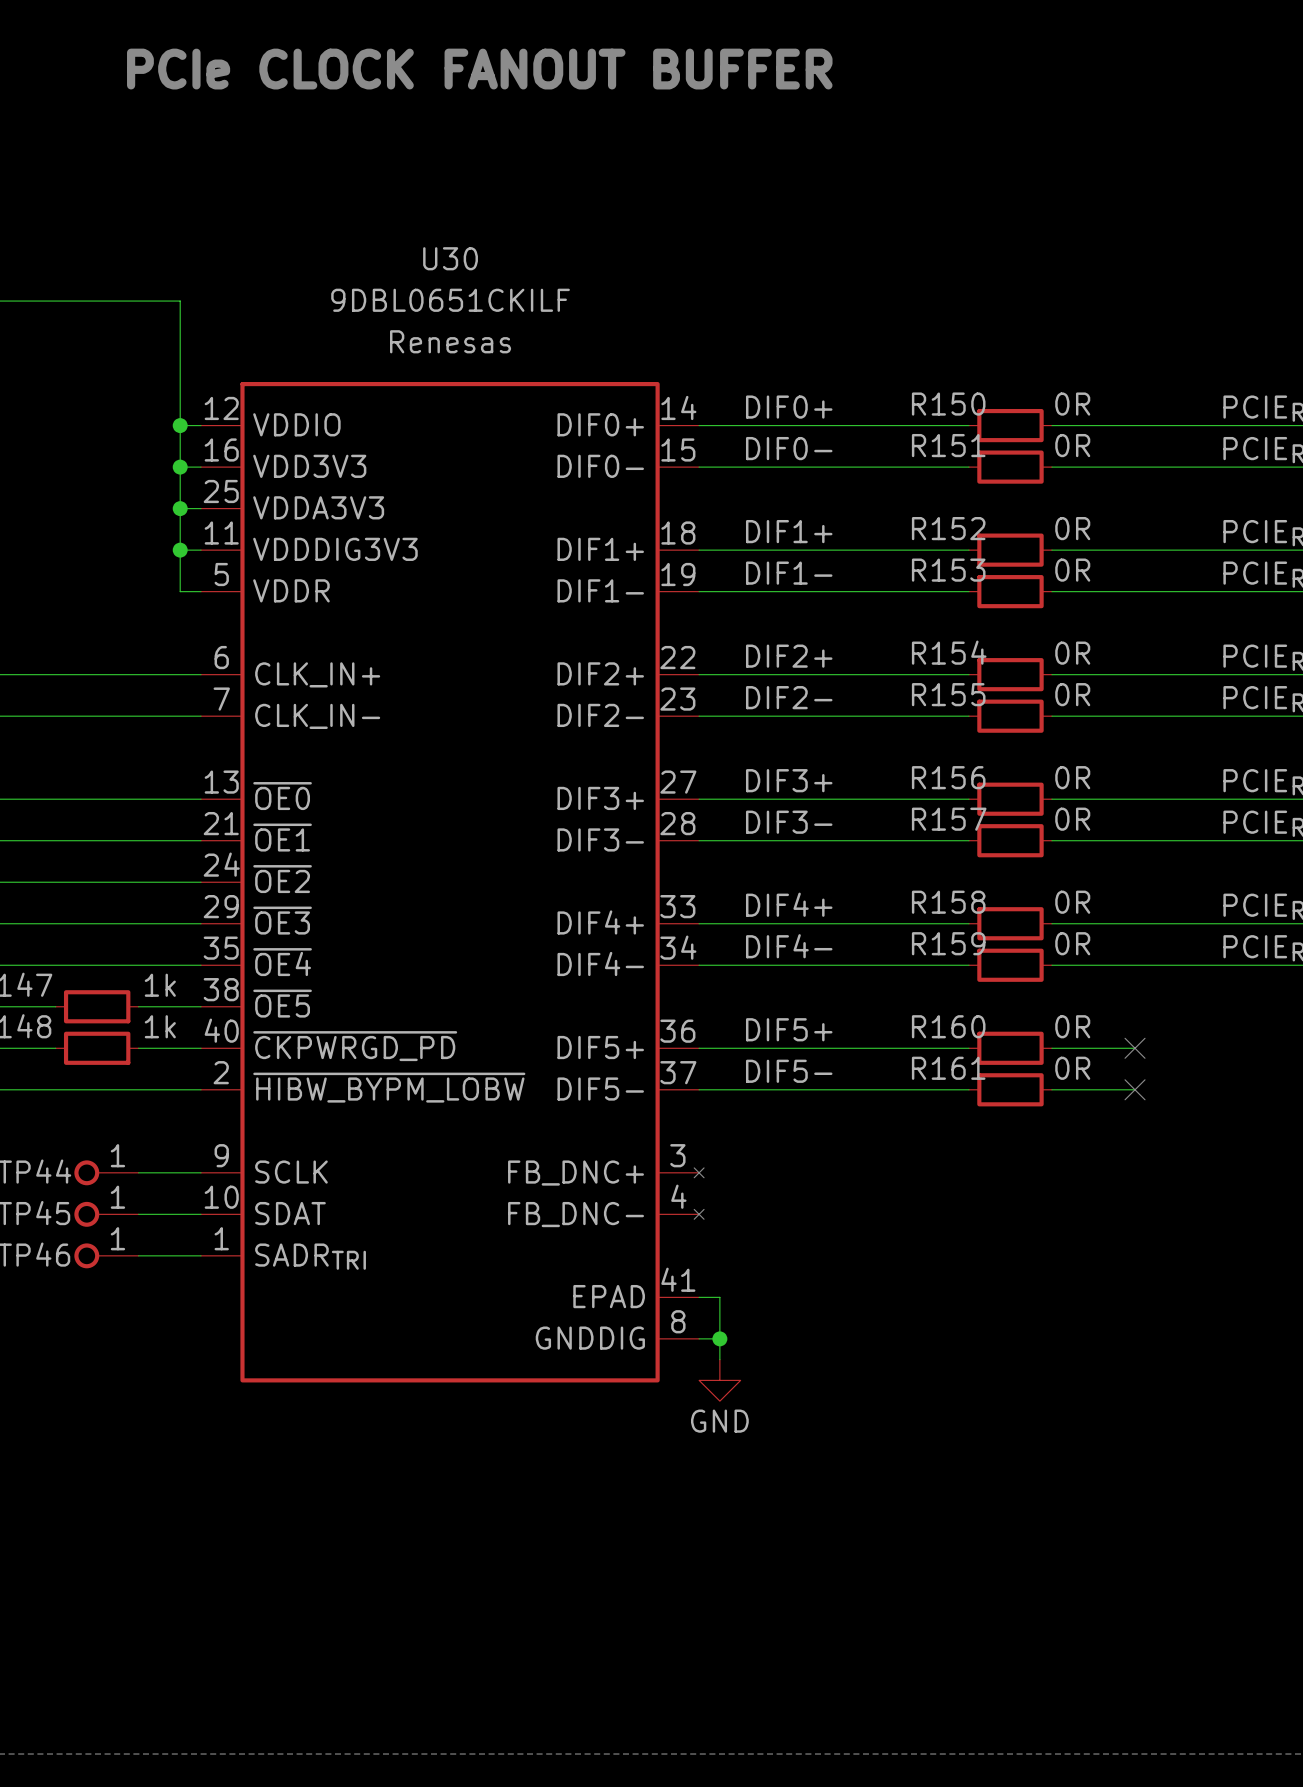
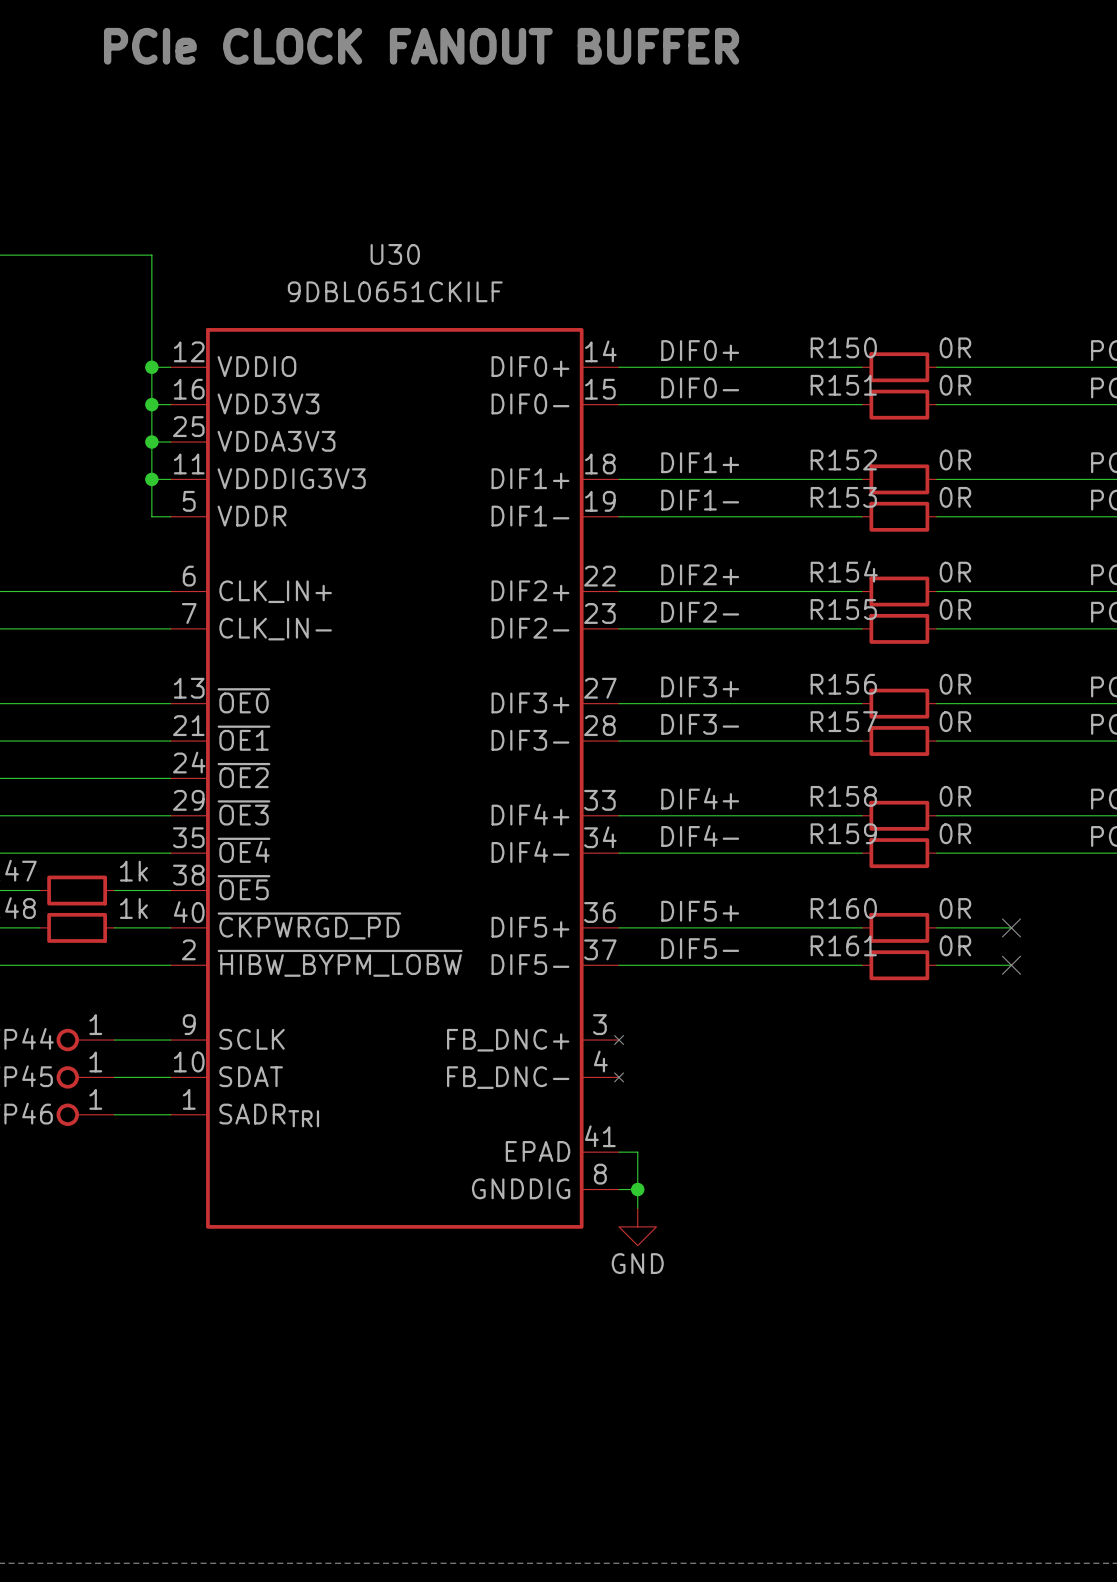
U30 name position: U30 (450, 258) -> U30 (395, 254)
U30 text position: 9DBL0651CKILF (450, 300) -> 9DBL0651CKILF (395, 291)
U30 text: Renesas (450, 341) -> none

